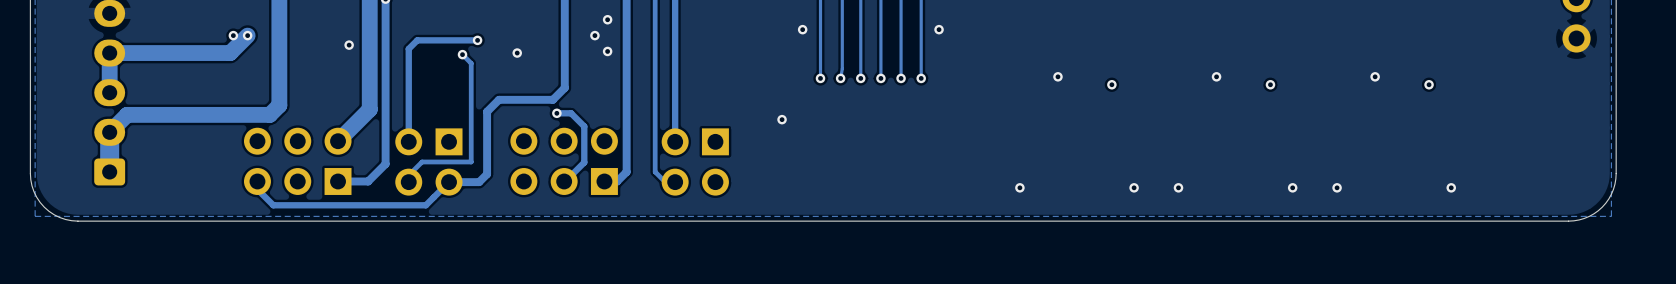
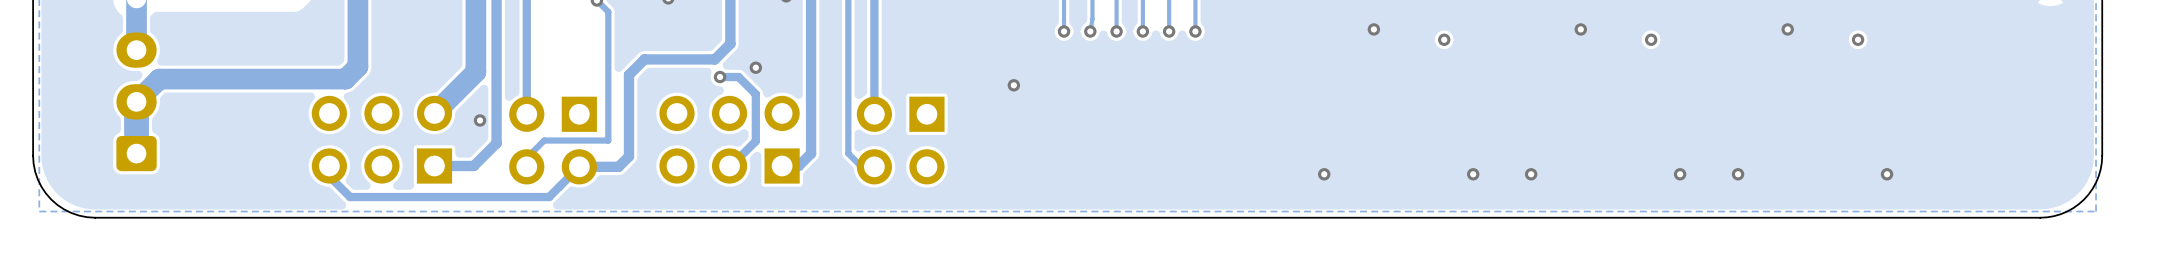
via: none -> (755, 67)
via: none -> (480, 120)

